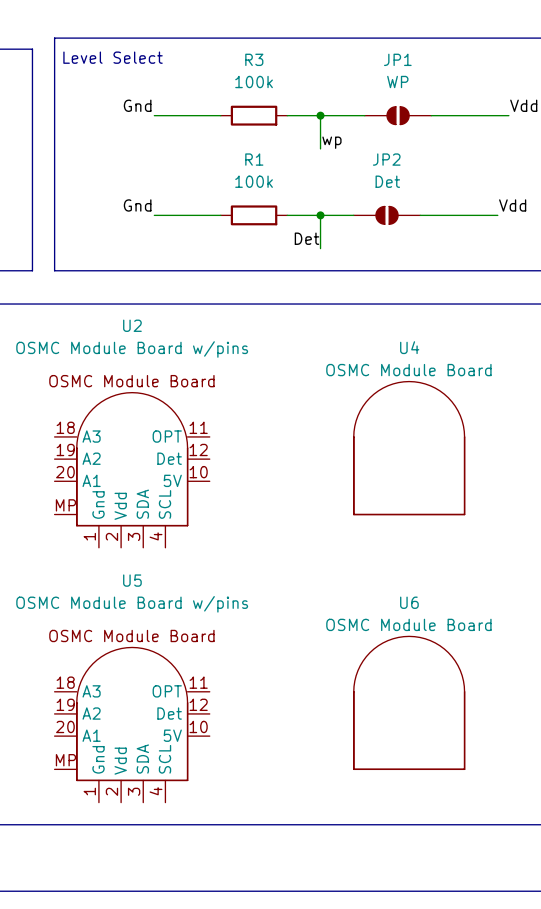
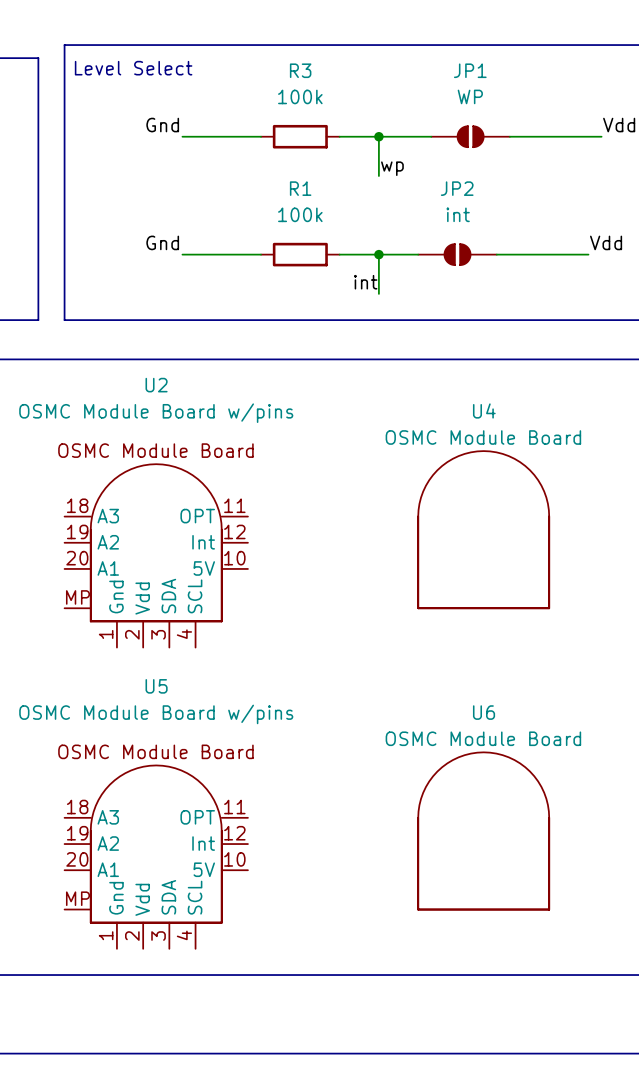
JP2 value: Det (387, 181) -> int (458, 214)
label: Det (306, 238) -> int (365, 282)
U2 pin name: Det (169, 458) -> Int (203, 542)
U5 pin name: Det (169, 713) -> Int (203, 843)

